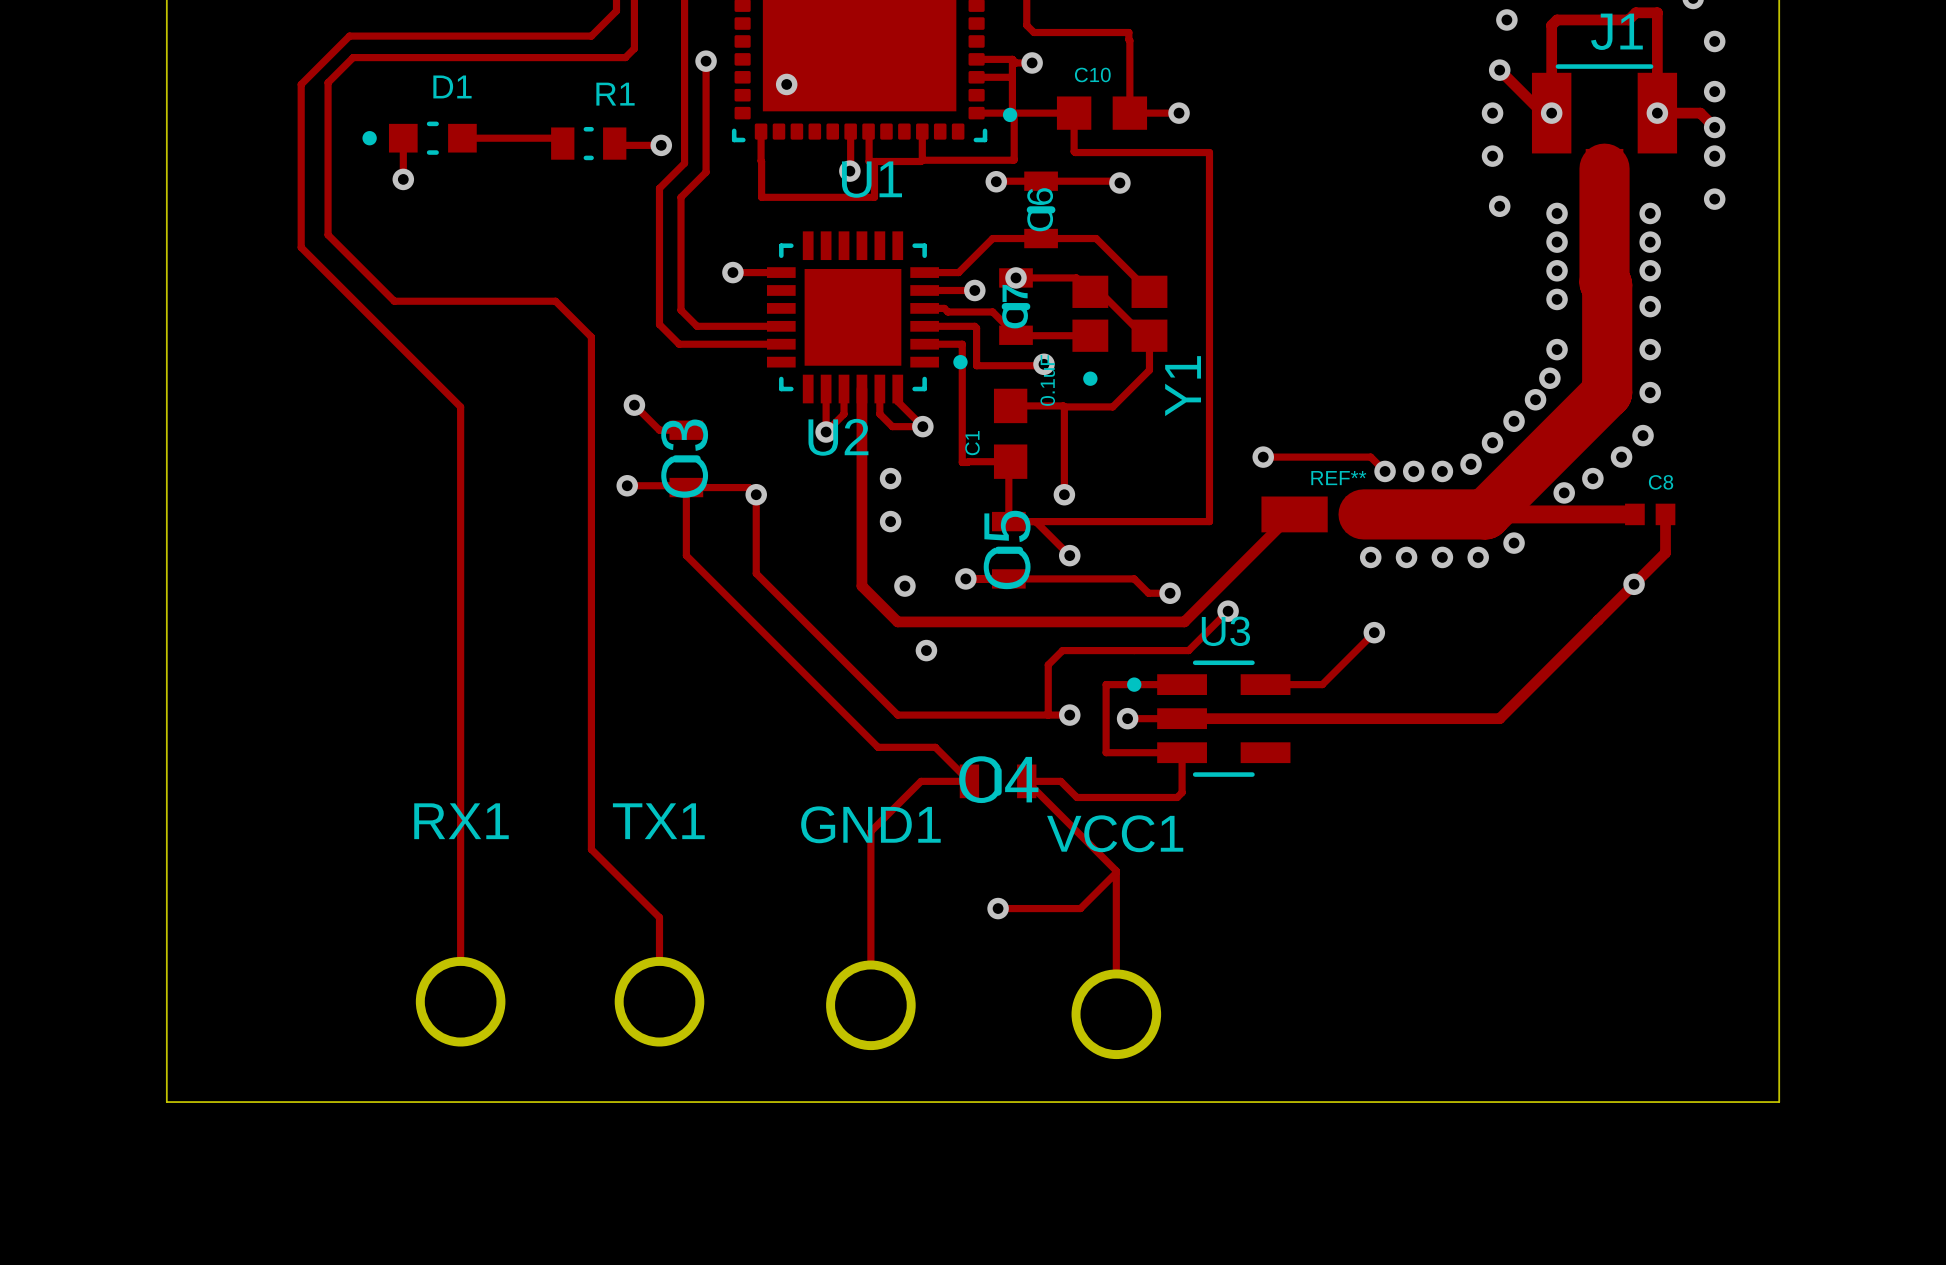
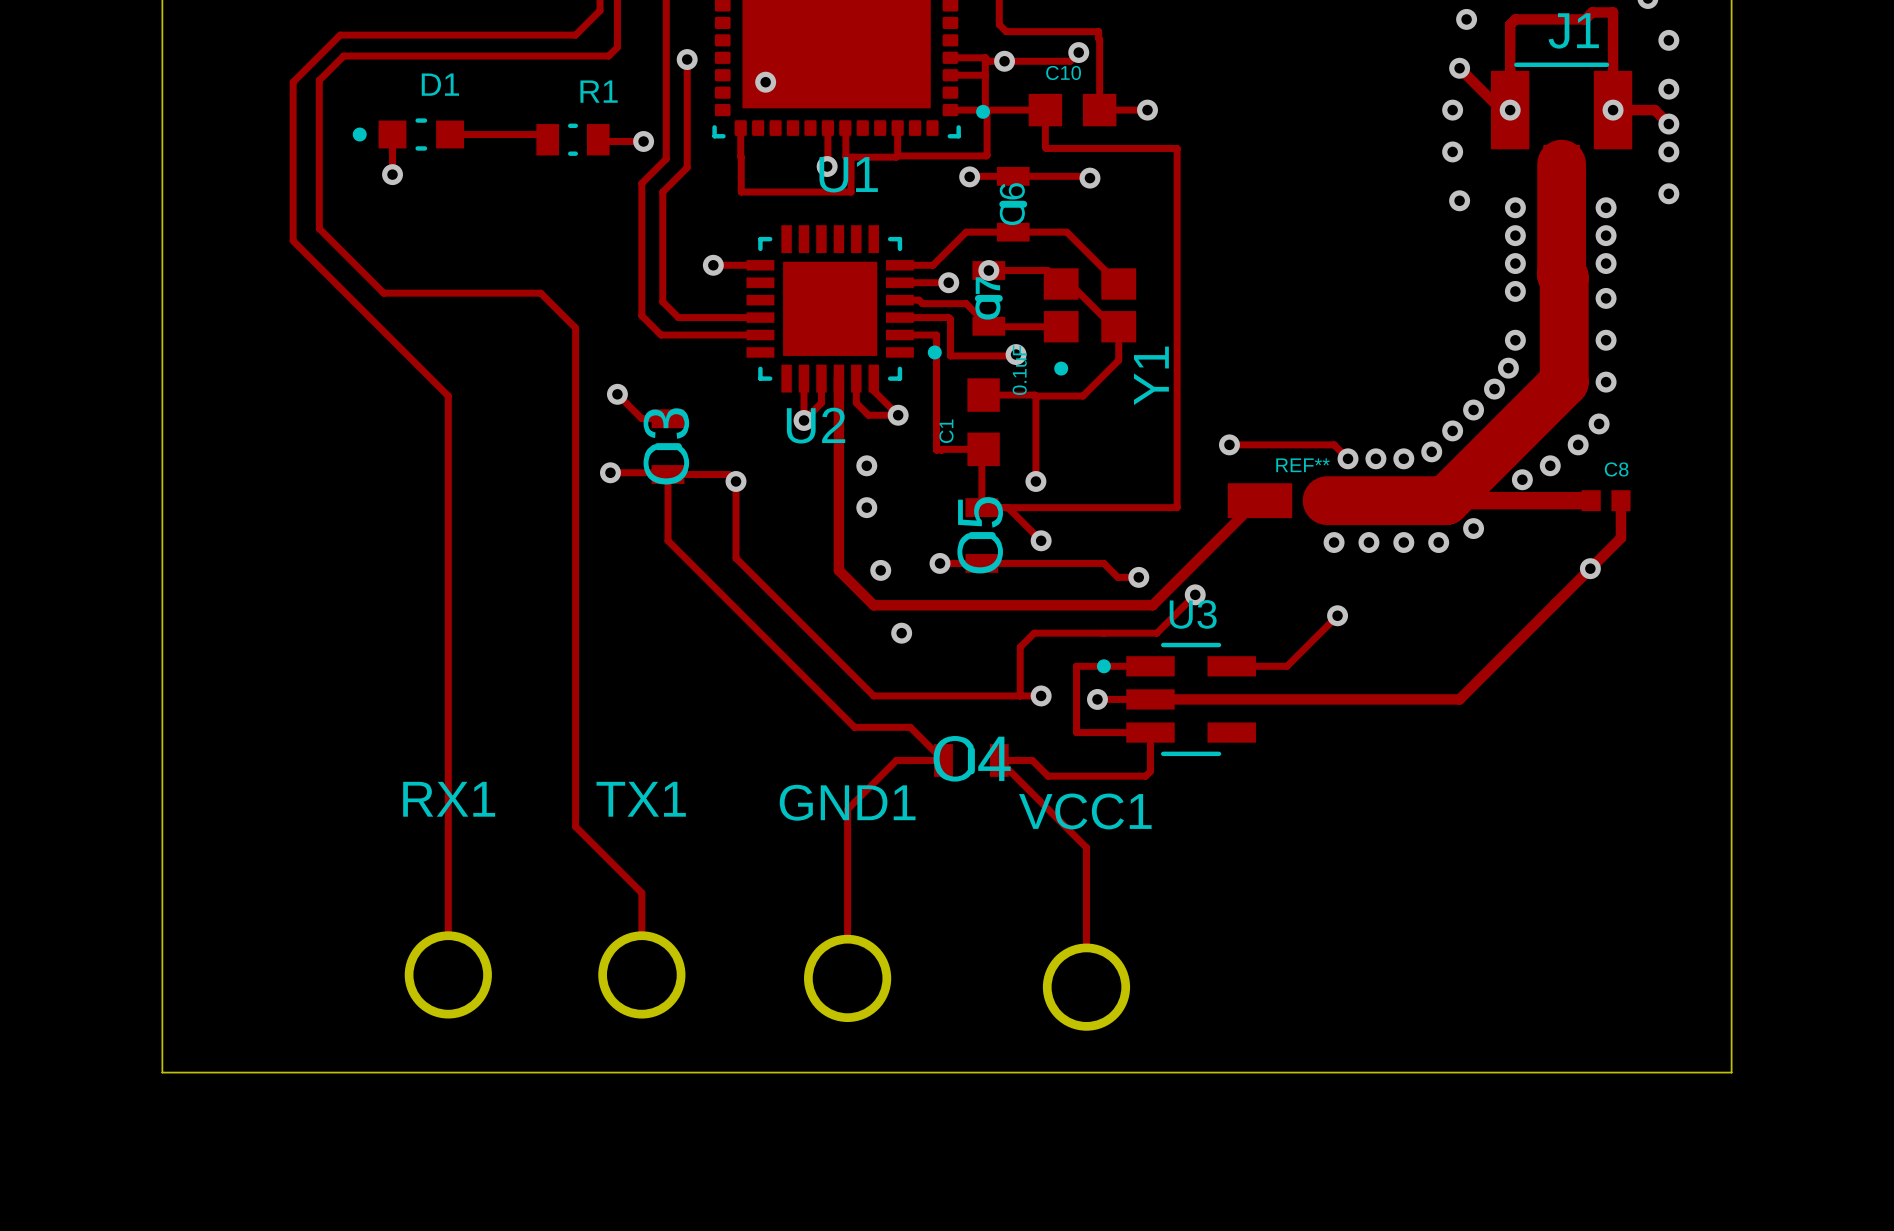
track: none -> (1078, 52) (1070, 61) (1004, 61)
via: none -> (1078, 52)
track: (1116, 872) (1080, 908) (998, 908) -> none
via: (998, 908) -> none

